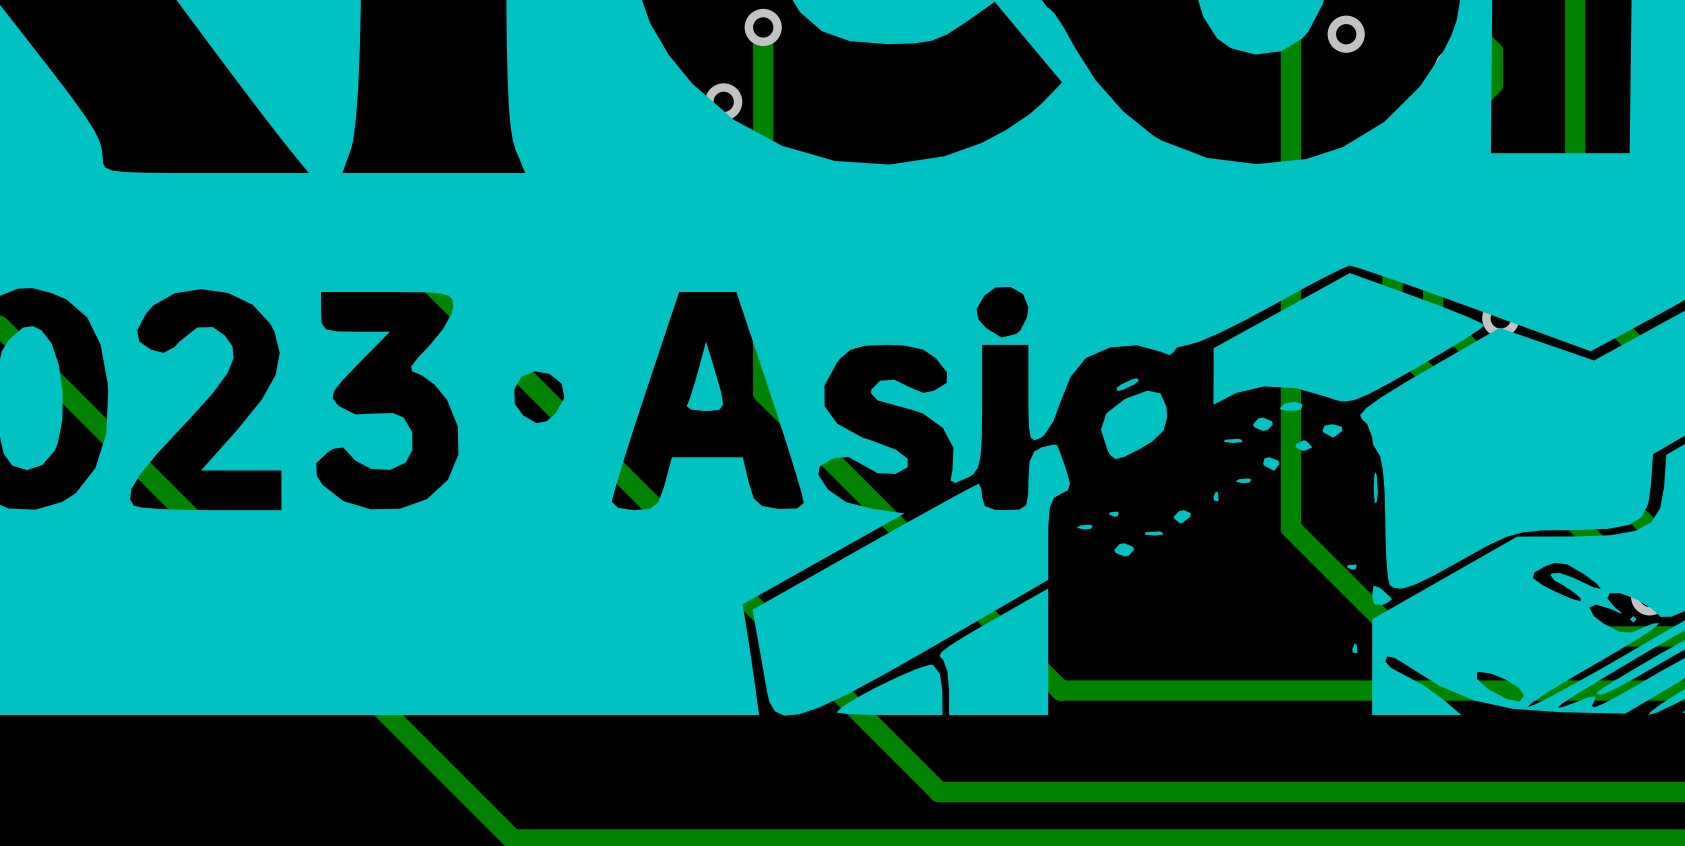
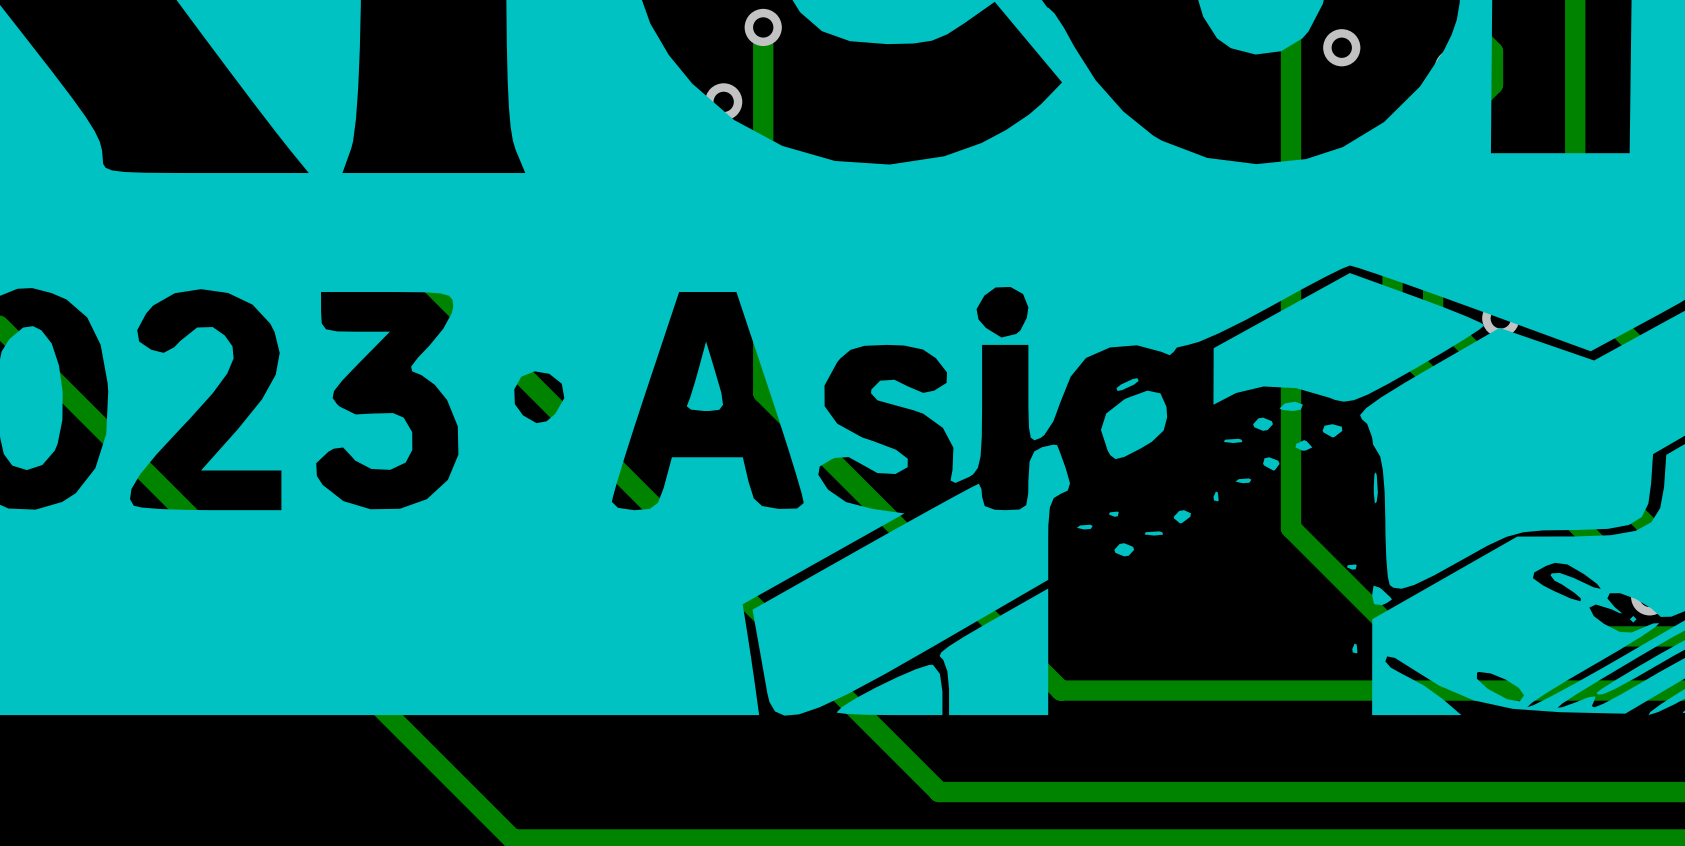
via position: (1346, 34) -> (1341, 47)

